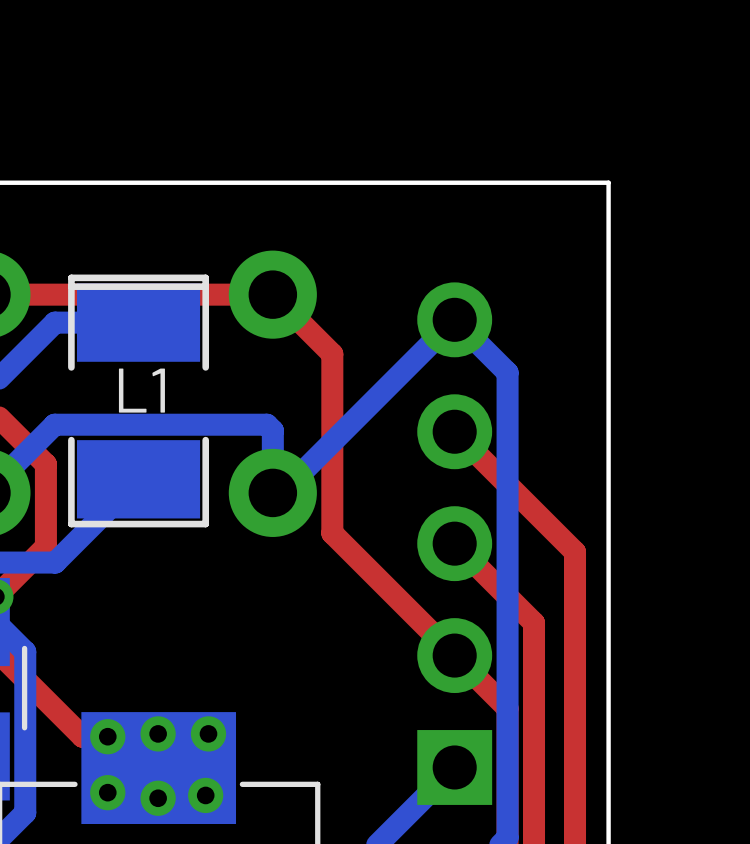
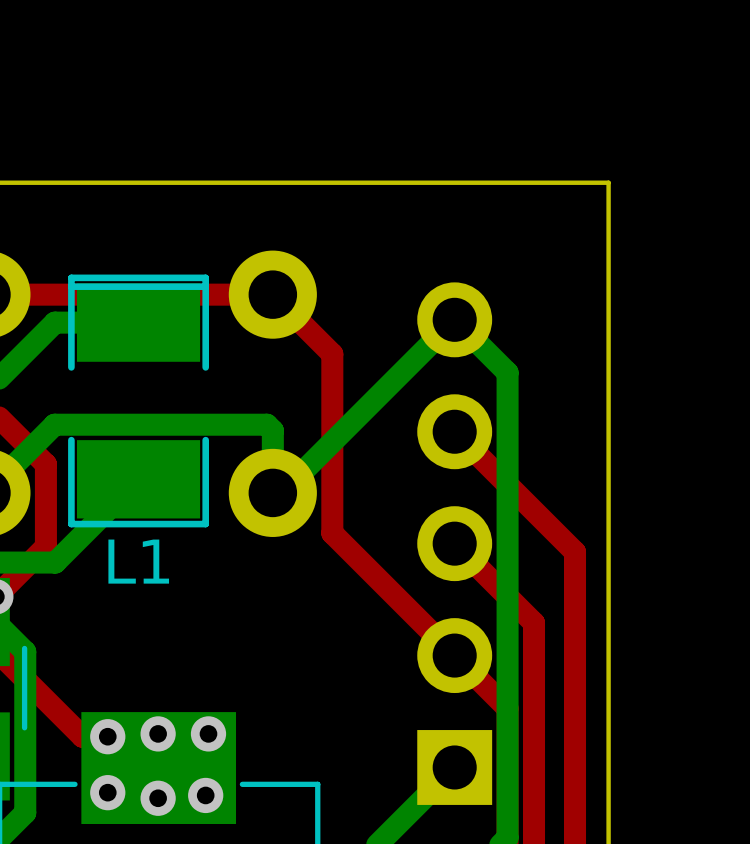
L1 name position: L1 (141, 390) -> L1 (138, 561)

